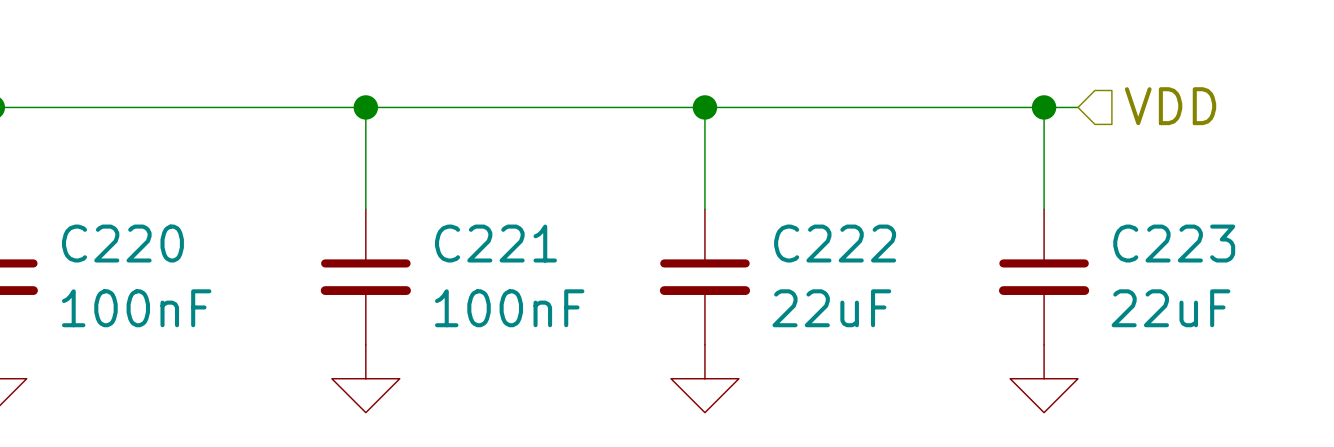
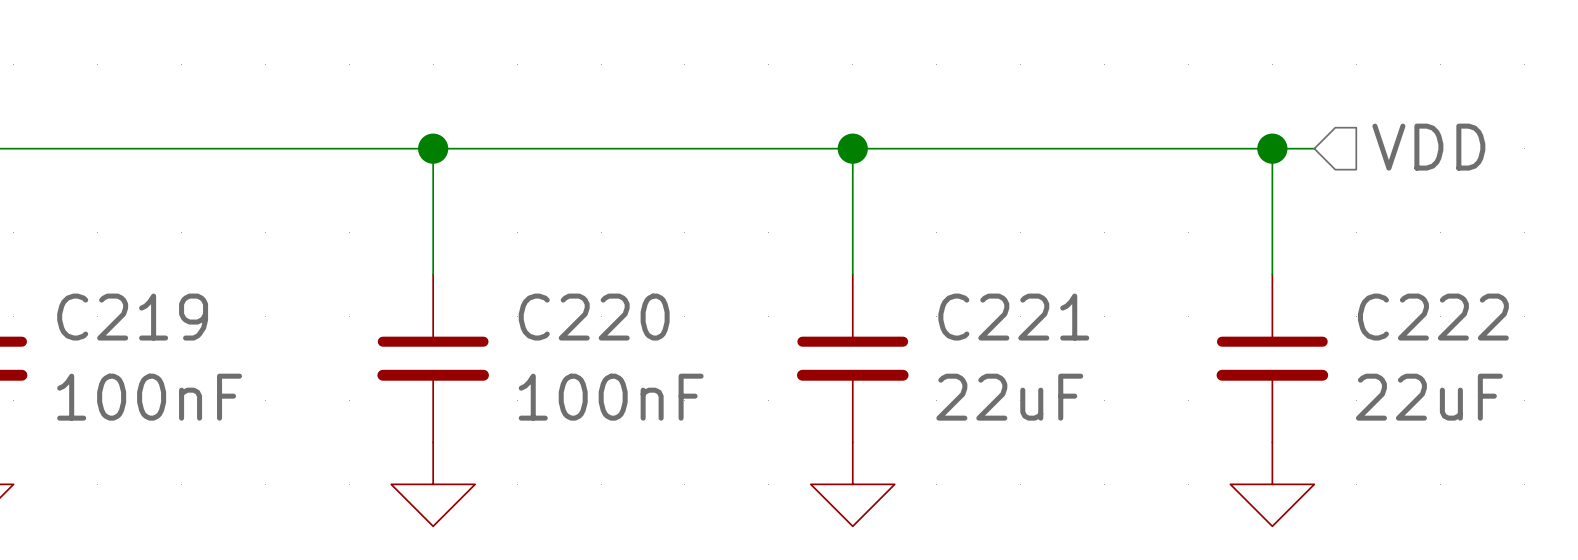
C220 name: C220 (122, 243) -> C219 (132, 317)
C221 name: C221 (495, 243) -> C220 (594, 317)
C222 name: C222 (835, 243) -> C221 (1013, 317)
C223 name: C223 (1174, 243) -> C222 (1433, 317)

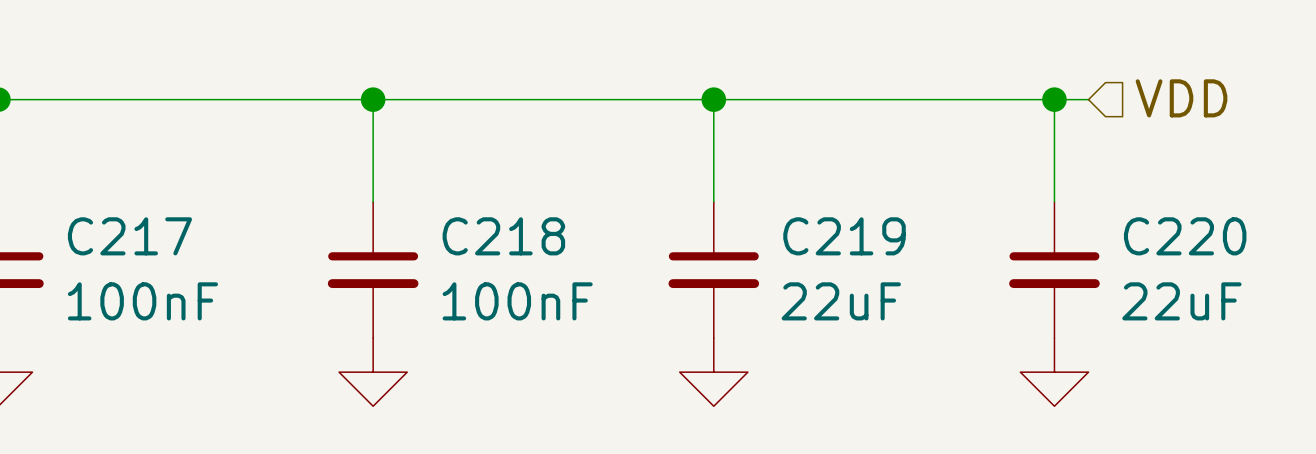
C219 name: C219 (132, 317) -> C217 (129, 236)
C220 name: C220 (594, 317) -> C218 (503, 236)
C221 name: C221 (1013, 317) -> C219 (844, 236)
C222 name: C222 (1433, 317) -> C220 (1185, 236)

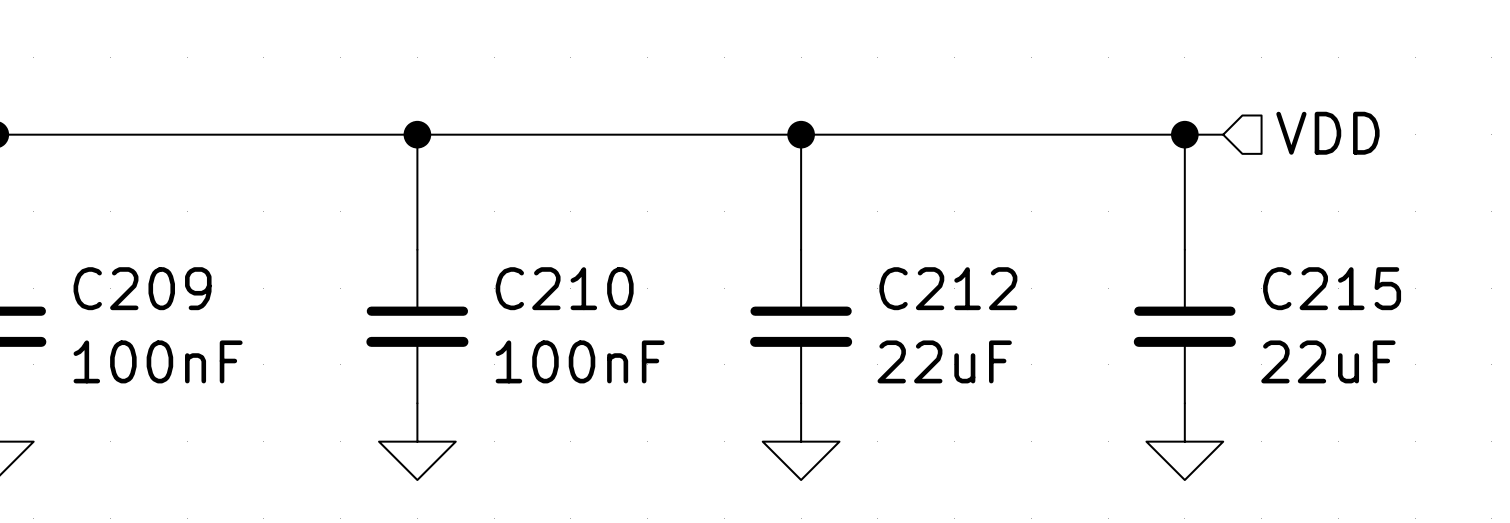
C217 name: C217 (129, 236) -> C209 (142, 288)
C218 name: C218 (503, 236) -> C210 (564, 288)
C219 name: C219 (844, 236) -> C212 (948, 288)
C220 name: C220 (1185, 236) -> C215 (1332, 288)

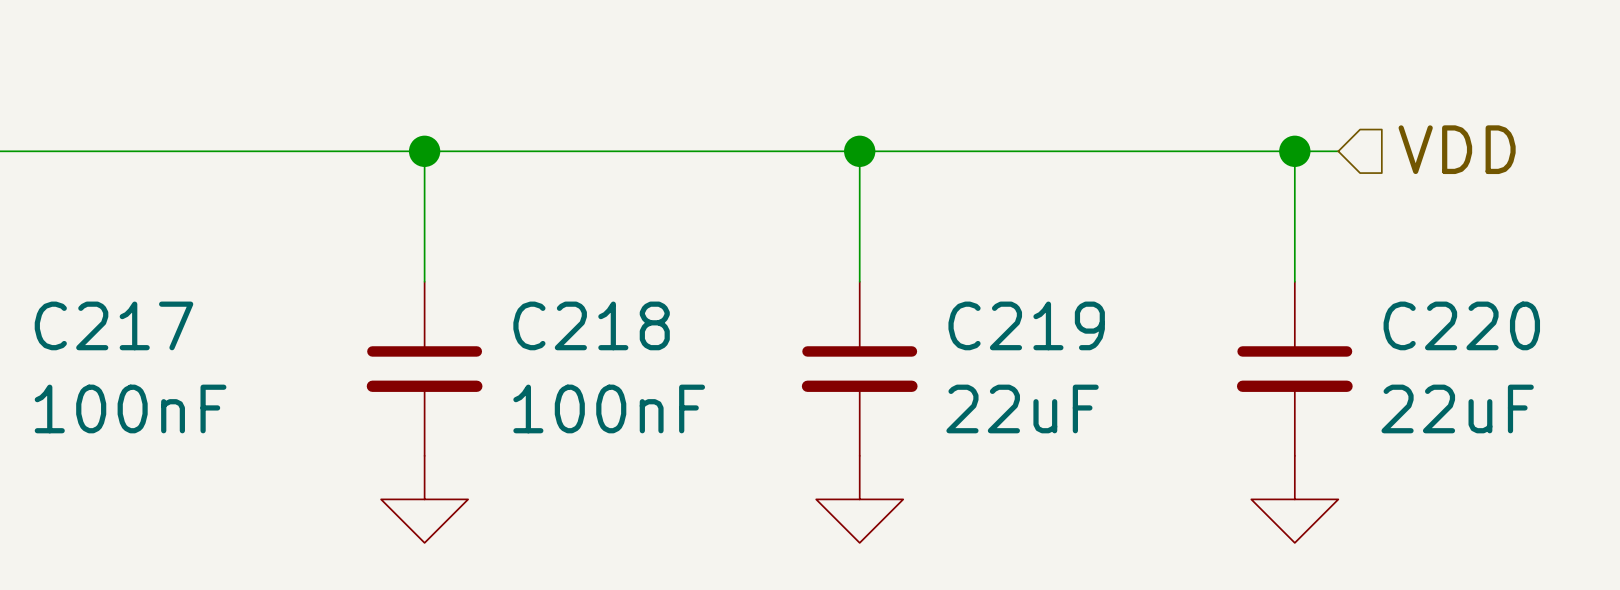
C209 name: C209 (142, 288) -> C217 (113, 325)
C210 name: C210 (564, 288) -> C218 (591, 325)
C212 name: C212 (948, 288) -> C219 (1026, 325)
C215 name: C215 (1332, 288) -> C220 (1461, 325)

